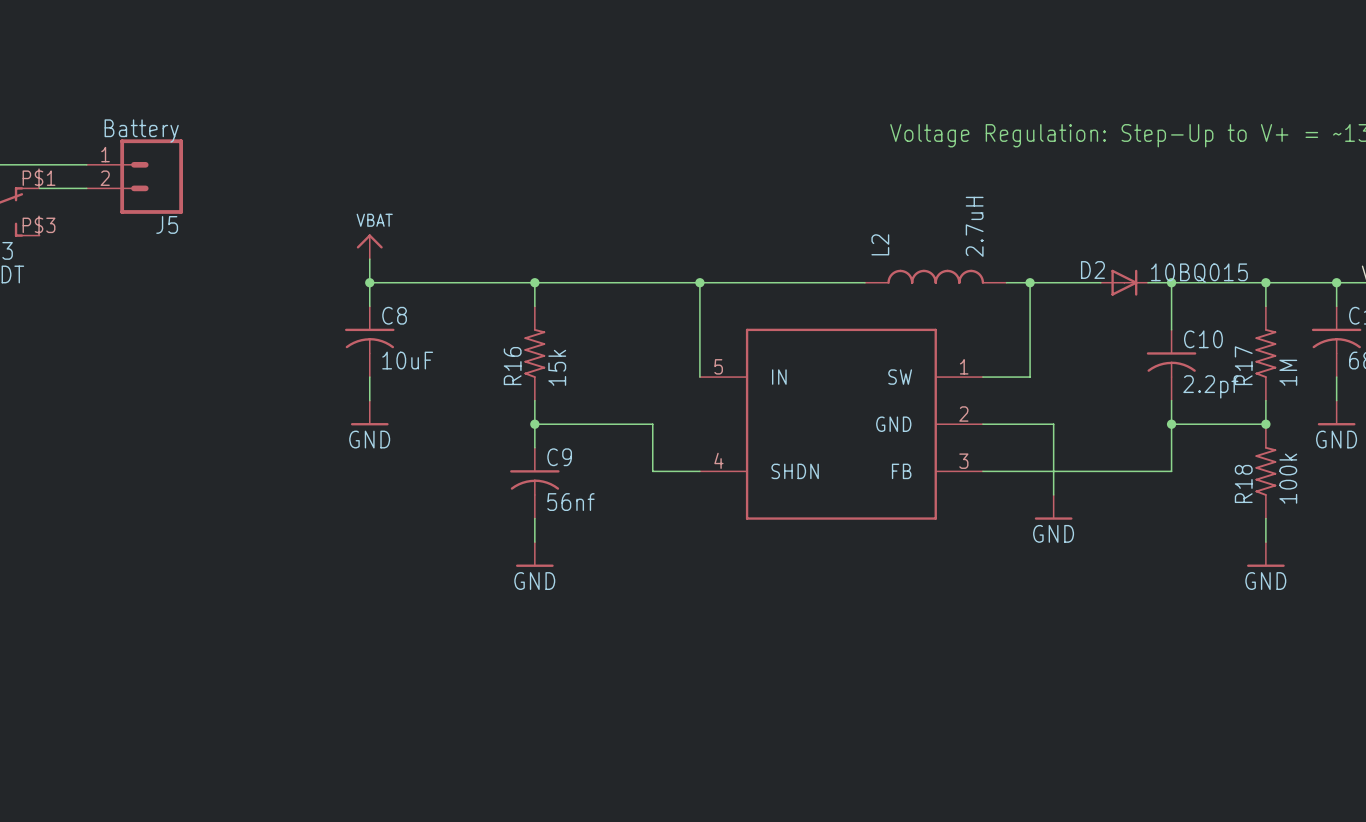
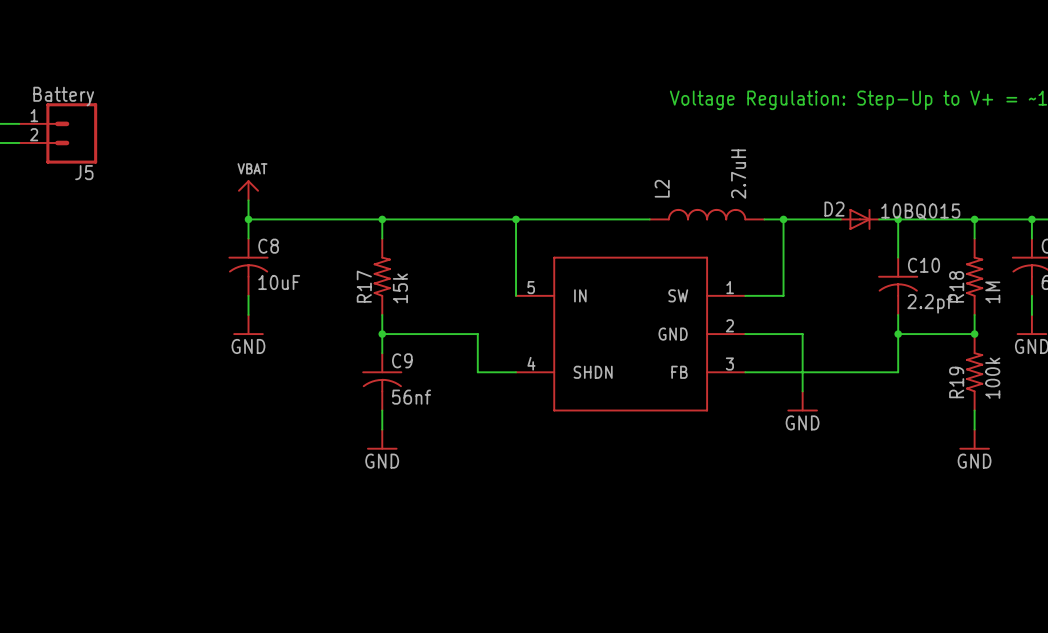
R17 name: R17 (1243, 365) -> R18 (956, 286)
R16 name: R16 (512, 366) -> R17 (364, 286)
R18 name: R18 (1243, 483) -> R19 (956, 382)

